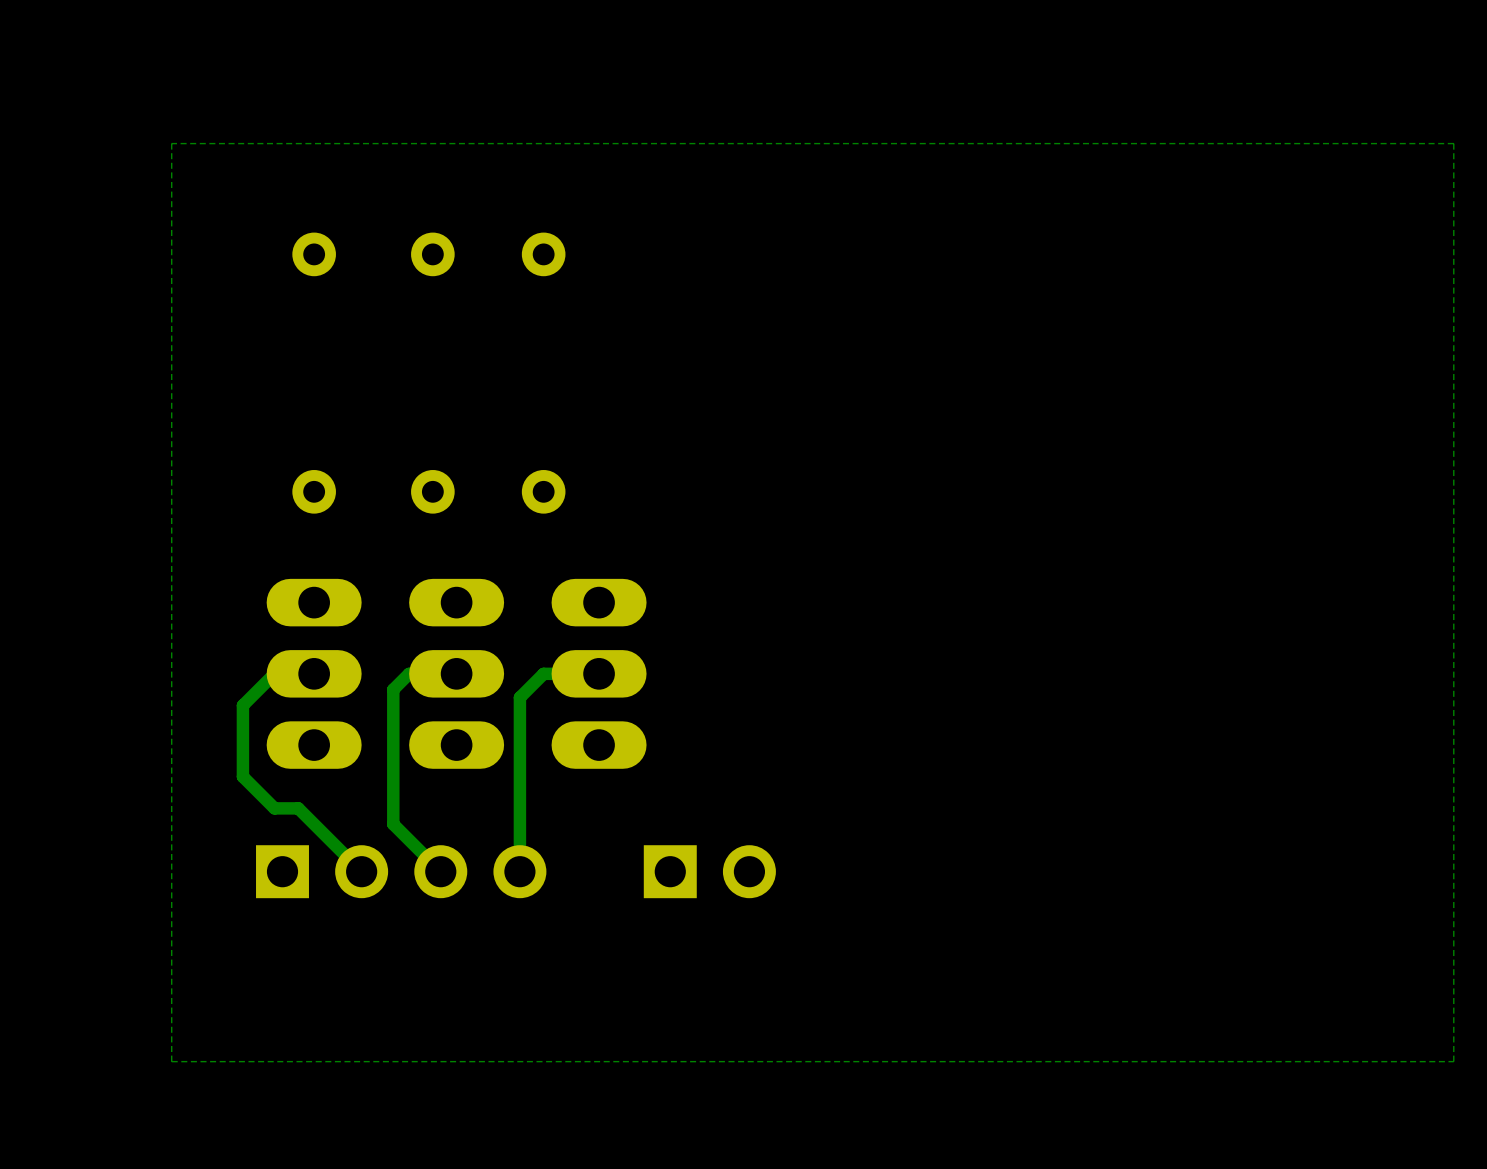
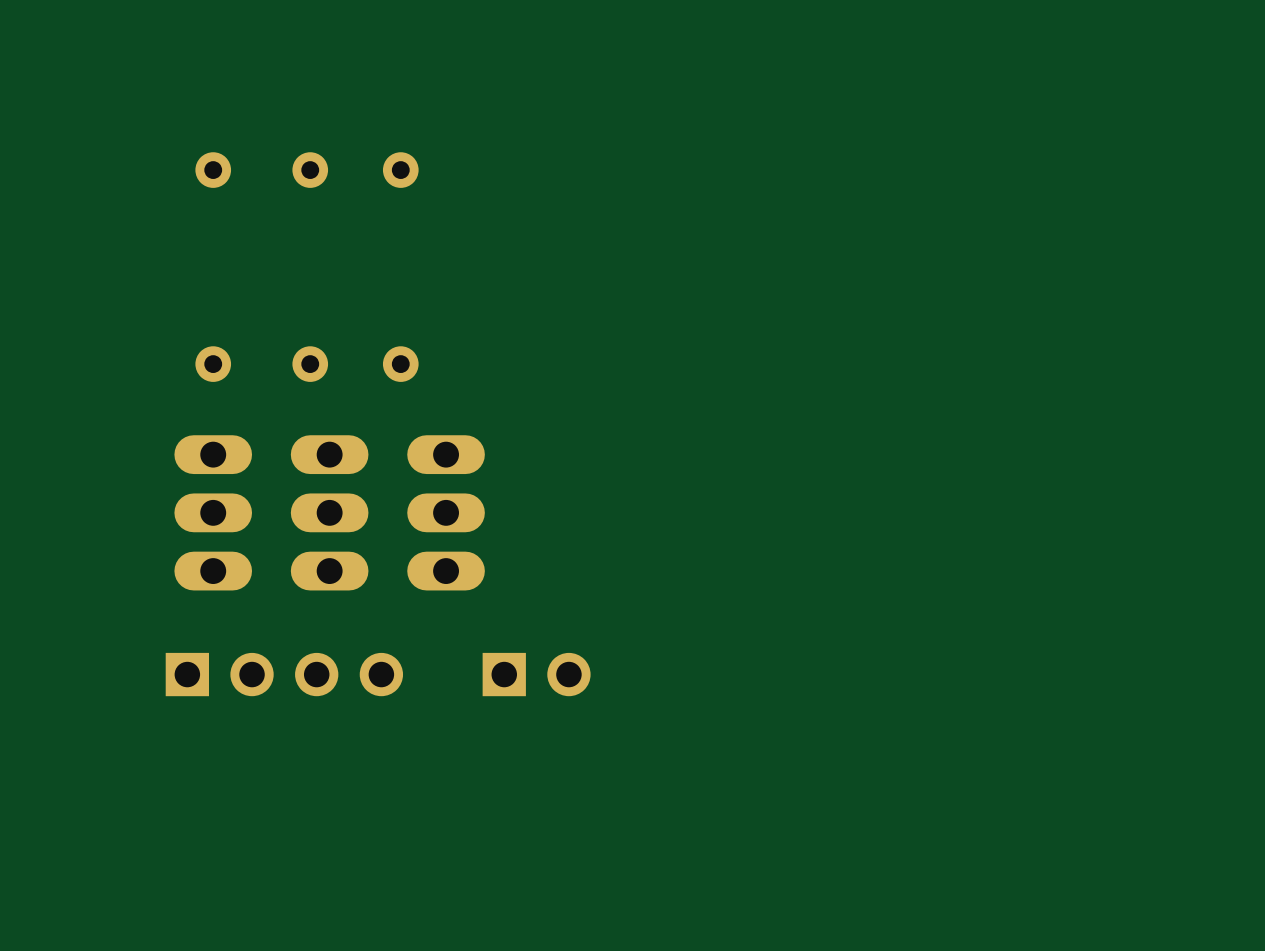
zone outline: (1453, 143) (1453, 1061) (171, 1061) (171, 143) (1453, 143) -> none
track: (314, 673) (274, 673) (242, 705) (242, 776) (274, 808) (298, 808) (361, 871) -> none
track: (456, 673) (409, 673) (393, 689) (393, 824) (440, 871) -> none
track: (599, 673) (543, 673) (519, 697) (519, 871) -> none

